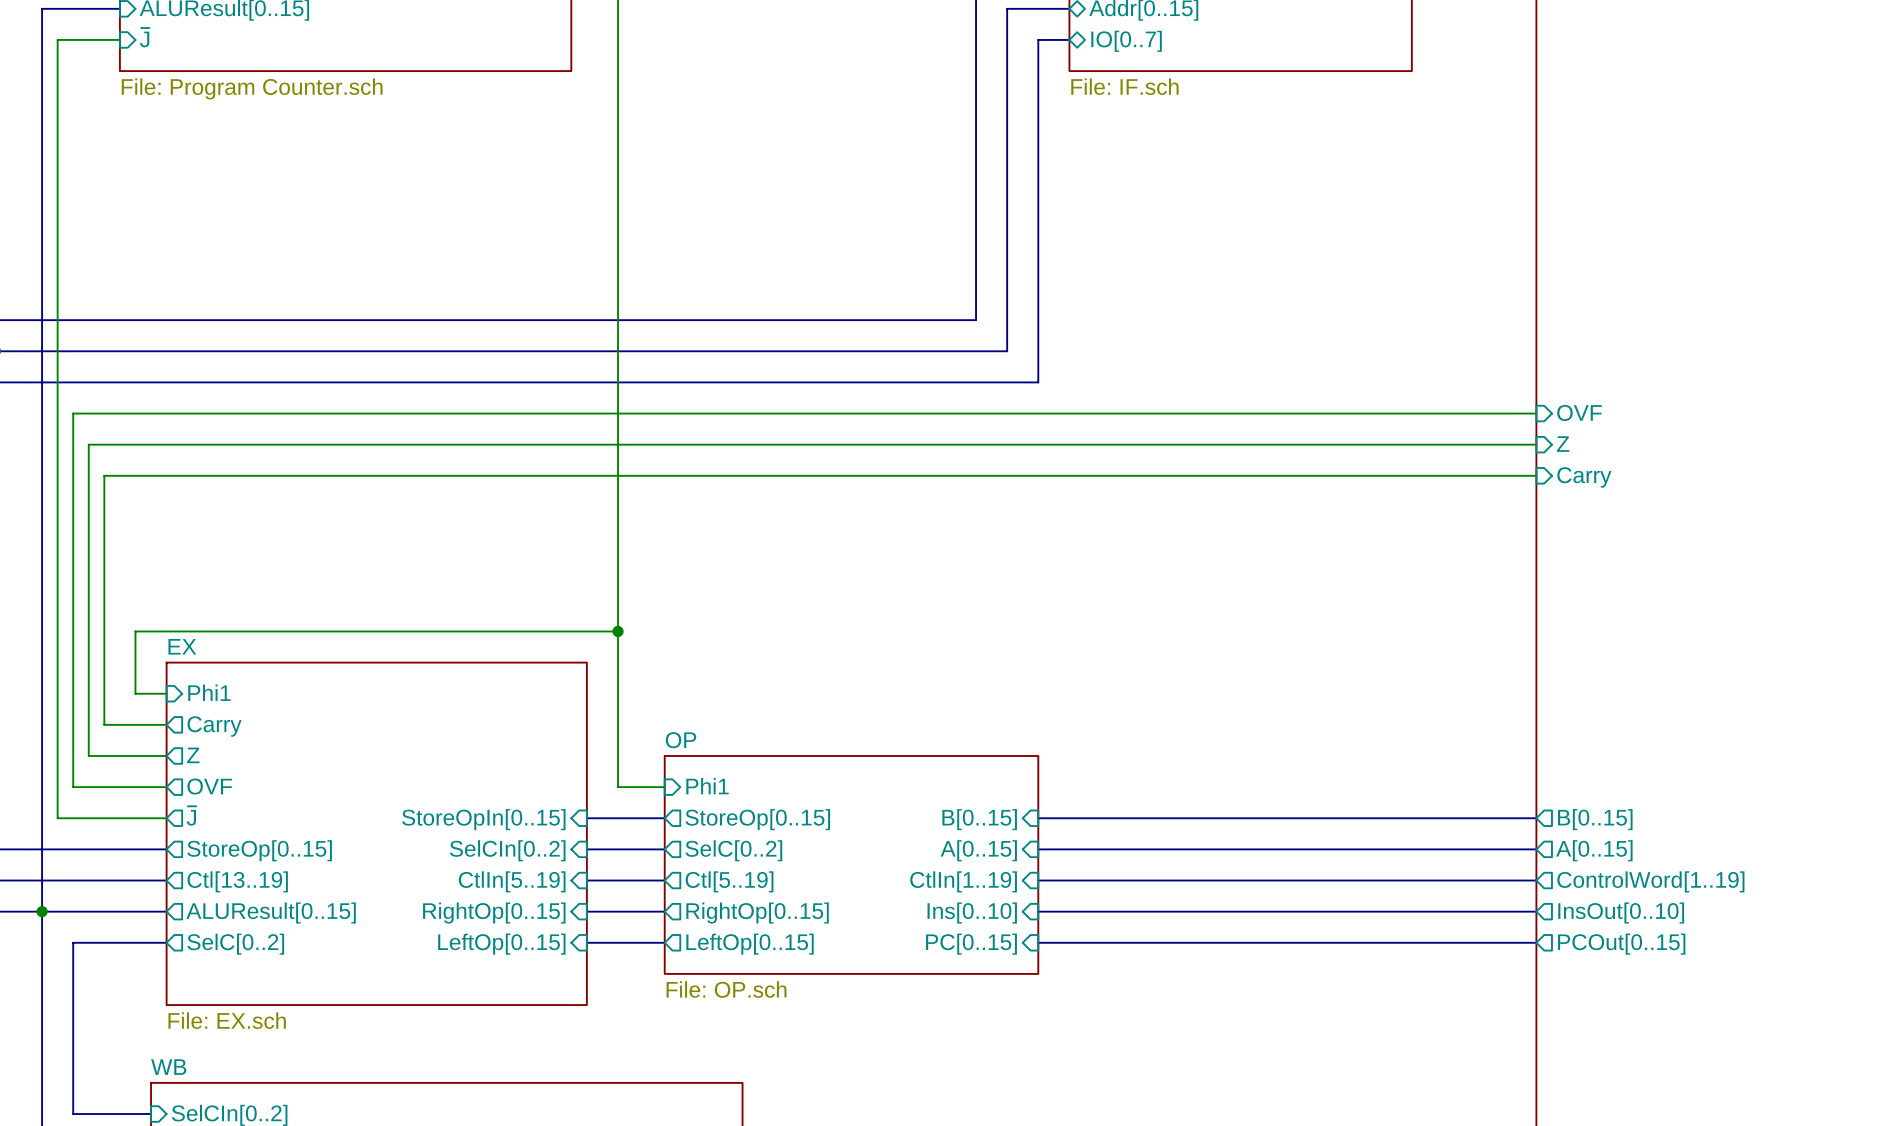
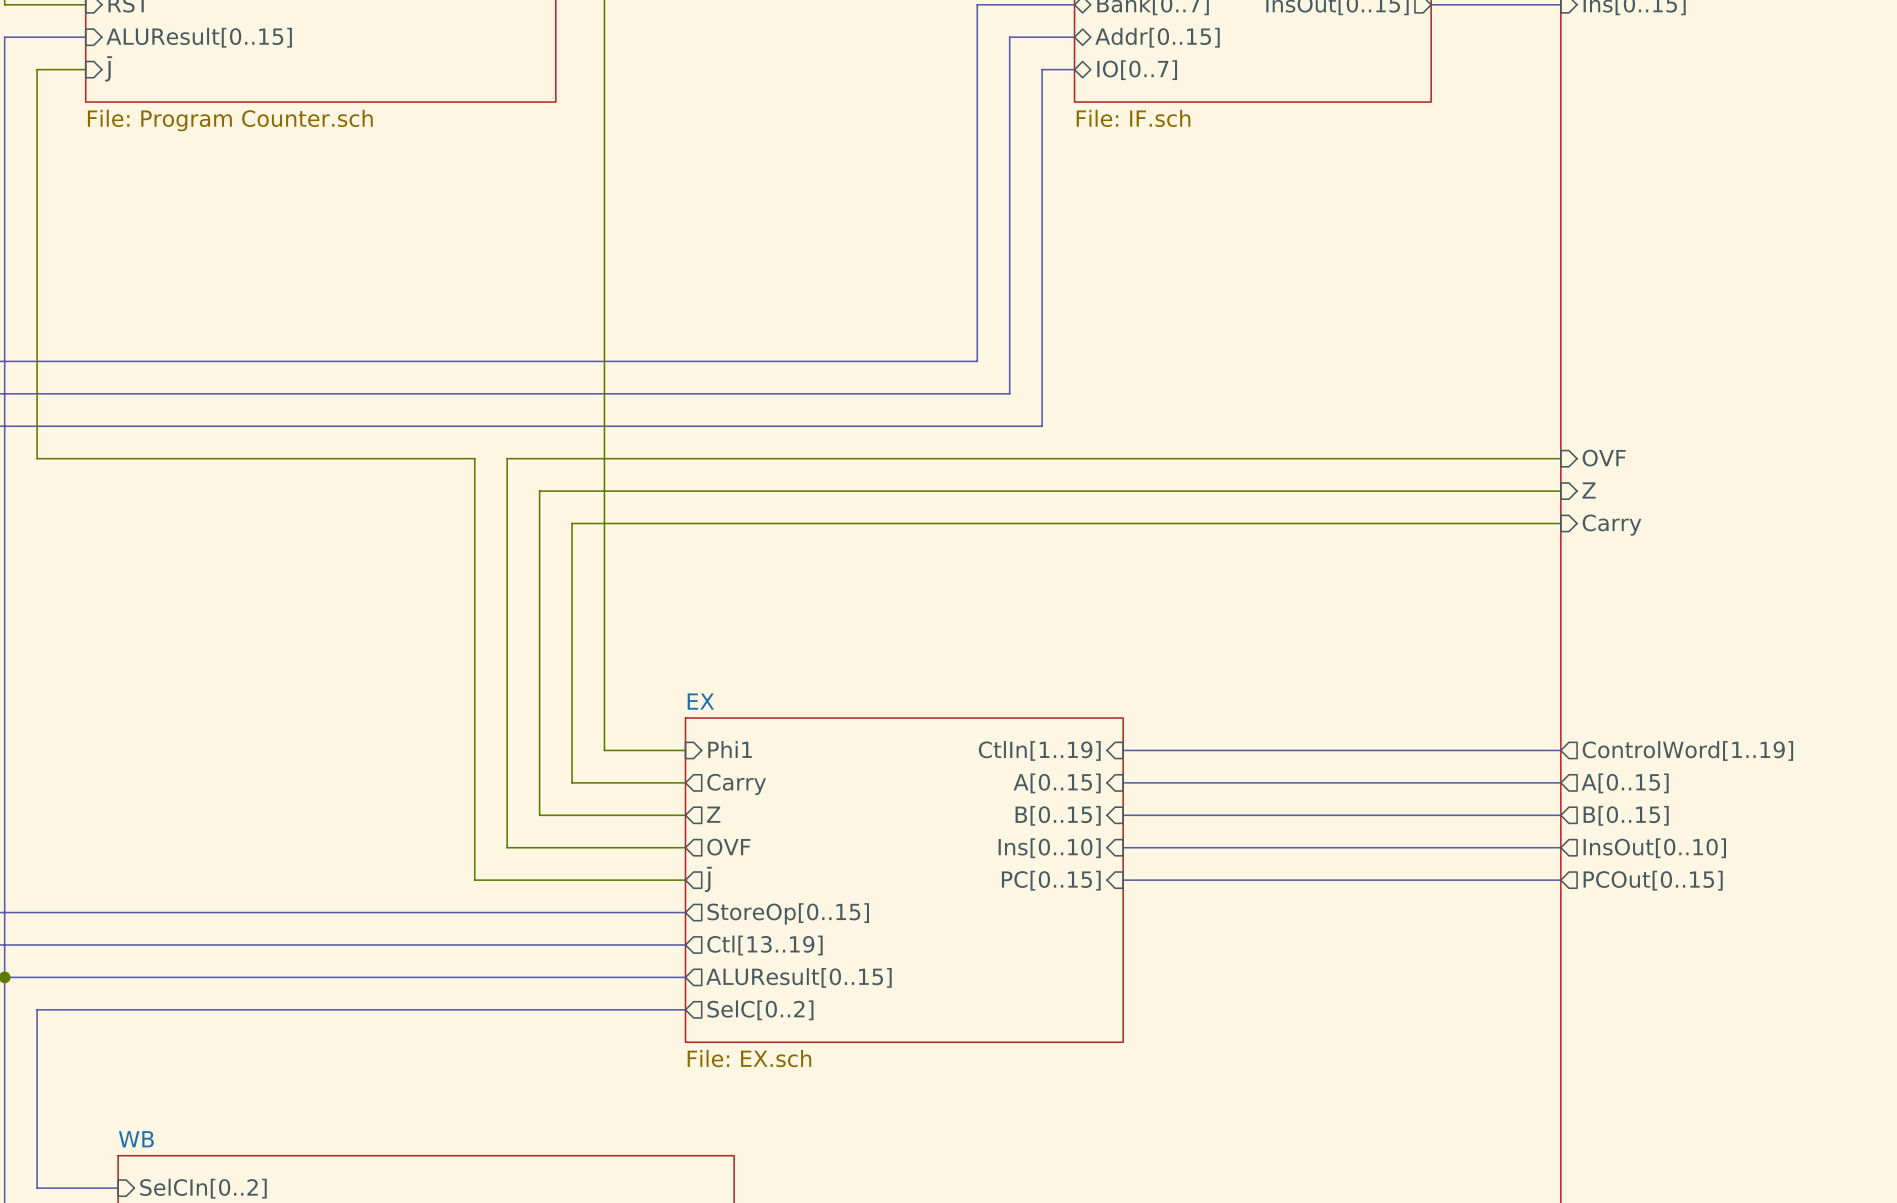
wire: (73, 39) (57, 39) (57, 818) (166, 818) -> (37, 69) (37, 458)
wire: (73, 413) (73, 787) (166, 787) -> none
wire: (493, 413) (524, 413) -> (604, 847) (507, 847) (507, 458)
wire: none -> (474, 458) (474, 880) (685, 880)
wire: (555, 444) (88, 444) (88, 756) (166, 756) -> (539, 491) (539, 815) (685, 815)
wire: (586, 475) (104, 475) (104, 724) (166, 724) -> (572, 523) (572, 782) (685, 782)
wire: (618, 631) (135, 631) (135, 693) (166, 693) -> none
junction: (618, 631) -> none
sheet pin: Phi1 (209, 692) -> none
wire: (618, 693) (618, 787) -> (604, 750) (685, 750)
bus: none -> (1123, 750) (1560, 750)
bus: none -> (1123, 782) (1560, 782)
sheet pin: Carry (214, 726) -> none
sheet pin: none -> Carry (736, 784)
sheet pin: Z (193, 755) -> none
sheet pin: none -> Z (713, 814)
bus: none -> (1123, 815) (1560, 815)
sheet pin: none -> B[0..15] (1626, 815)
sheet pin: OVF (209, 786) -> none
sheet pin position: Phi1 (707, 786) -> Phi1 (730, 749)
sheet pin: none -> OVF (728, 847)
wire: none -> (653, 847) (685, 847)
bus: none -> (1123, 847) (1560, 847)
sheet pin: ~{J} (191, 816) -> none
sheet pin: none -> ~{J} (707, 879)
bus: (586, 818) (664, 818) -> none
sheet EX: none -> File: EX.sch (904, 880)
bus: (1038, 818) (1116, 818) -> none
sheet pin: StoreOpIn[0..15] (483, 819) -> none
sheet pin position: StoreOp[0..15] (757, 819) -> StoreOp[0..15] (788, 913)
sheet pin position: B[0..15] (979, 819) -> B[0..15] (1058, 815)
sheet pin: B[0..15] (1595, 819) -> PCOut[0..15] (1653, 880)
sheet EX: File: EX.sch (376, 833) -> none
bus: none -> (134, 912) (572, 912)
bus: none -> (653, 912) (685, 912)
bus: (1038, 849) (1536, 849) -> none
sheet pin: StoreOp[0..15] (259, 850) -> none
sheet pin: SelCIn[0..2] (507, 850) -> none
sheet pin position: SelC[0..2] (733, 850) -> SelC[0..2] (760, 1010)
sheet pin position: A[0..15] (978, 850) -> A[0..15] (1057, 783)
sheet pin position: A[0..15] (1594, 850) -> A[0..15] (1625, 783)
sheet OP: File: OP.sch (851, 864) -> none
bus: none -> (134, 944) (572, 944)
bus: none -> (653, 944) (685, 944)
bus: (1038, 880) (1536, 880) -> none
sheet pin: Ctl[13..19] (237, 881) -> none
sheet pin: CtlIn[5..19] (512, 881) -> none
sheet pin: Ctl[5..19] (729, 881) -> Ctl[13..19] (764, 945)
sheet pin position: CtlIn[1..19] (963, 881) -> CtlIn[1..19] (1039, 750)
sheet pin position: ControlWord[1..19] (1650, 881) -> ControlWord[1..19] (1687, 750)
bus: none -> (134, 977) (572, 977)
bus: none -> (653, 977) (685, 977)
bus: (1038, 911) (1536, 911) -> none
sheet pin: ALUResult[0..15] (271, 913) -> none
sheet pin: RightOp[0..15] (494, 913) -> none
sheet pin: RightOp[0..15] (757, 913) -> none
sheet pin position: Ins[0..10] (972, 913) -> Ins[0..10] (1049, 848)
sheet pin position: InsOut[0..10] (1621, 913) -> InsOut[0..10] (1654, 848)
bus: none -> (134, 1009) (572, 1009)
bus: none -> (653, 1009) (685, 1009)
bus: (1038, 942) (1536, 942) -> none
sheet pin: SelC[0..2] (235, 944) -> none
sheet pin: LeftOp[0..15] (501, 944) -> none
sheet pin: LeftOp[0..15] (750, 944) -> ALUResult[0..15] (798, 977)
sheet pin position: PC[0..15] (971, 944) -> PC[0..15] (1051, 880)
sheet pin: PCOut[0..15] (1621, 944) -> none

